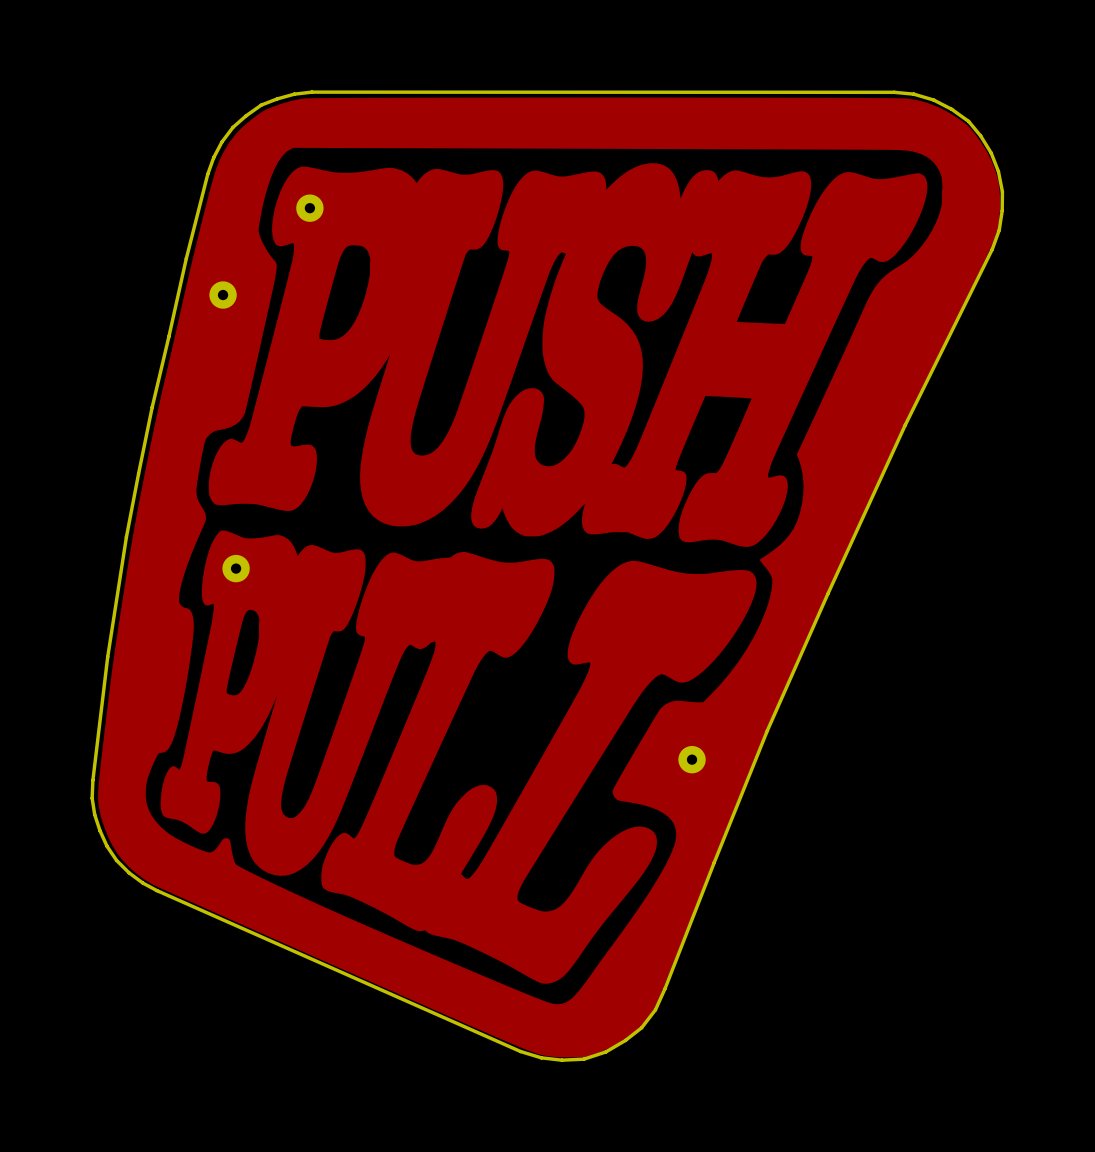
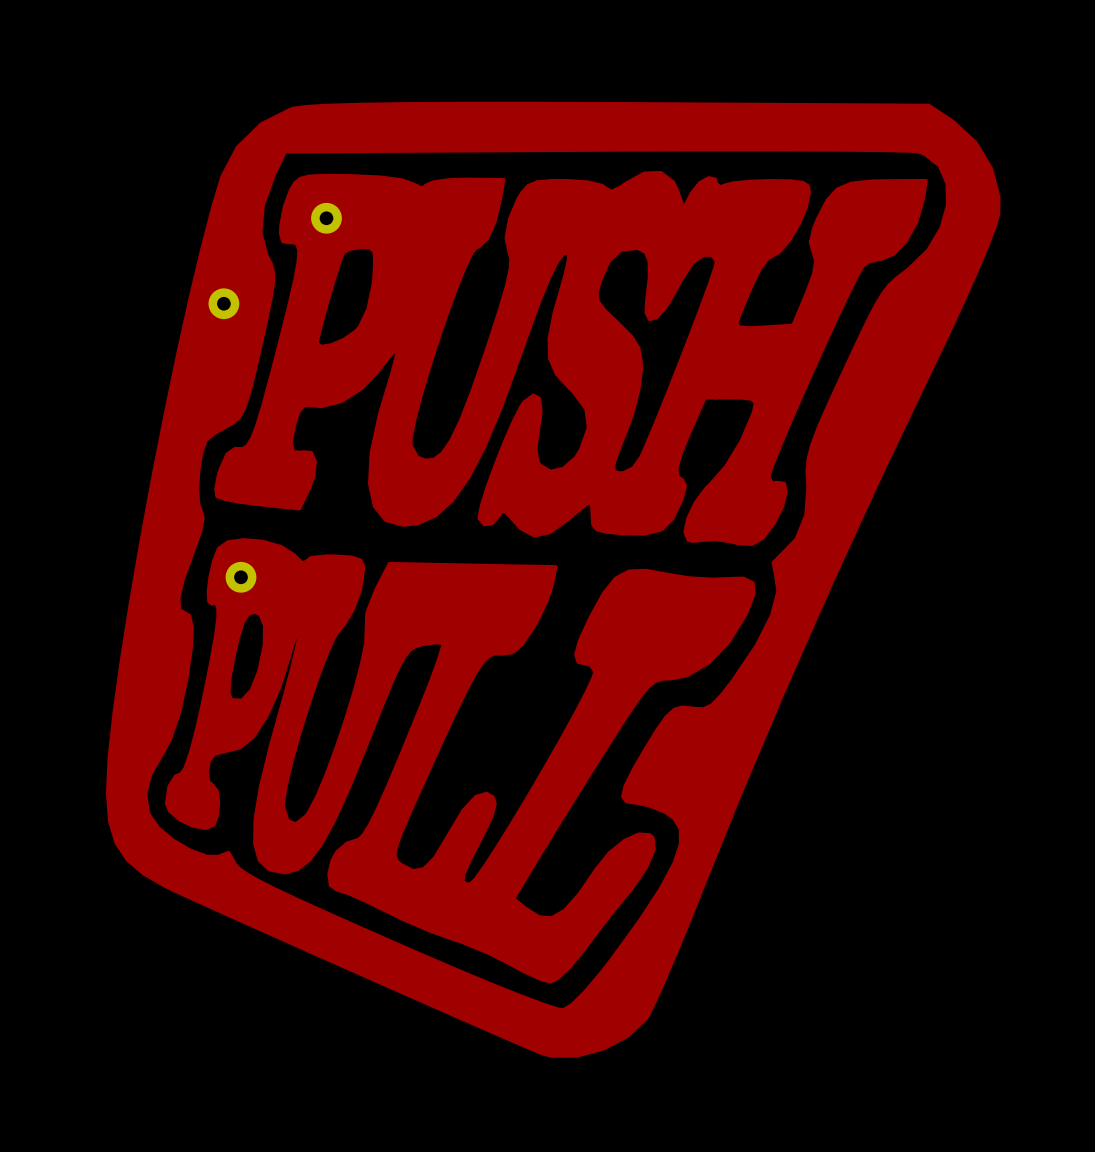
board edge: (311, 92) (894, 92) (913, 94) (933, 99) (951, 109) (968, 121) (991, 152) (998, 171) (1002, 191) (1002, 210) (999, 230) (992, 249) (905, 425) (827, 594) (767, 730) (655, 1009) (641, 1027) (625, 1040) (605, 1051) (584, 1059) (561, 1060) (541, 1057) (520, 1051) (157, 890) (129, 872) (116, 860) (107, 846) (94, 814) (92, 798) (92, 780) (107, 657) (126, 537) (152, 407) (207, 174) (221, 141) (232, 127) (245, 115) (261, 105) (277, 98) (311, 92) -> none
part footprint: [98, 97, 1001, 1058] -> [105, 101, 1001, 1058]

